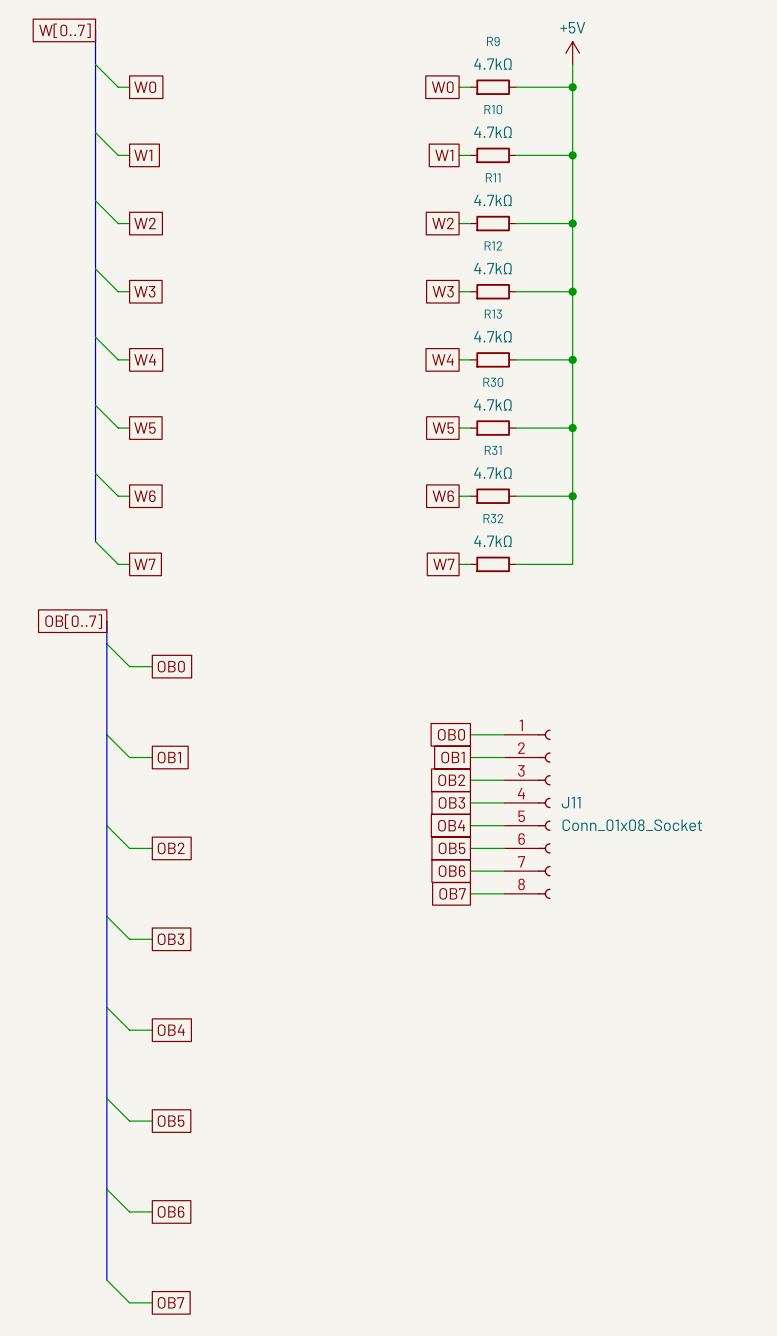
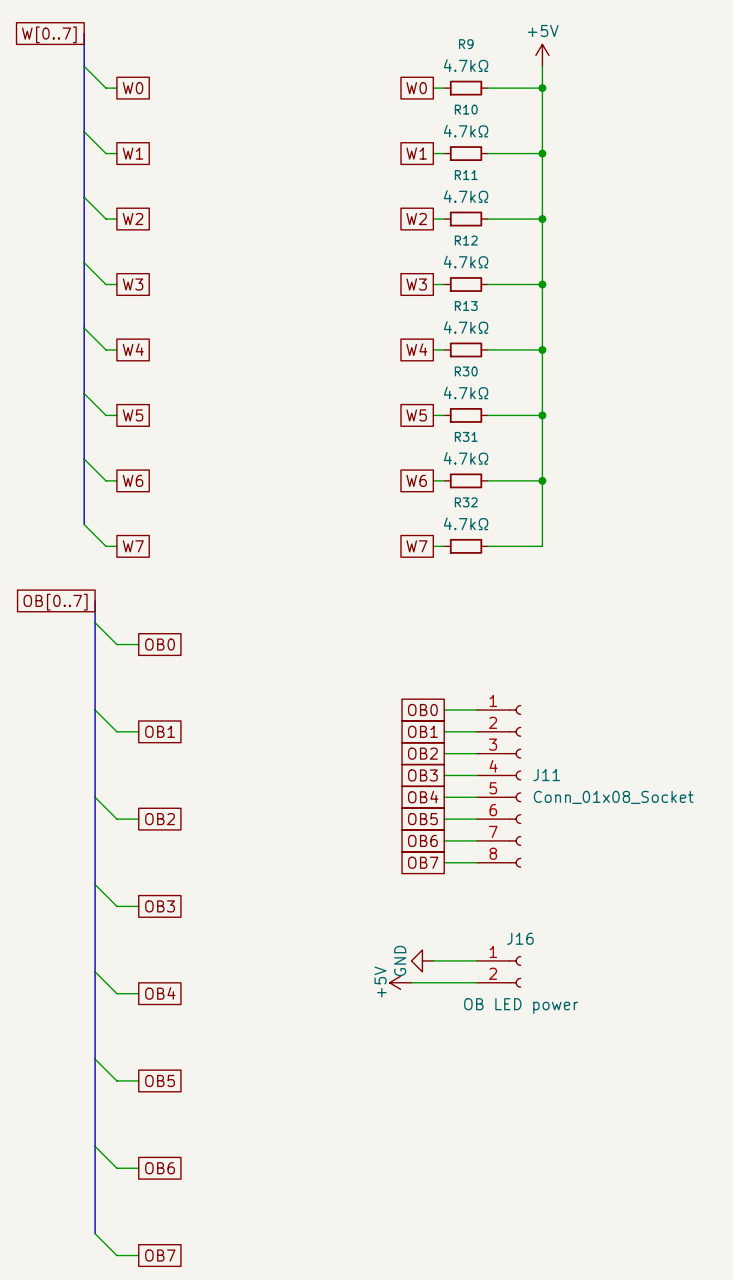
power symbol: none -> GND (422, 960)
wire: none -> (433, 960) (476, 960)
J16: none -> OB LED power (499, 971)
power symbol: none -> +5V (400, 982)
wire: none -> (411, 982) (476, 982)

